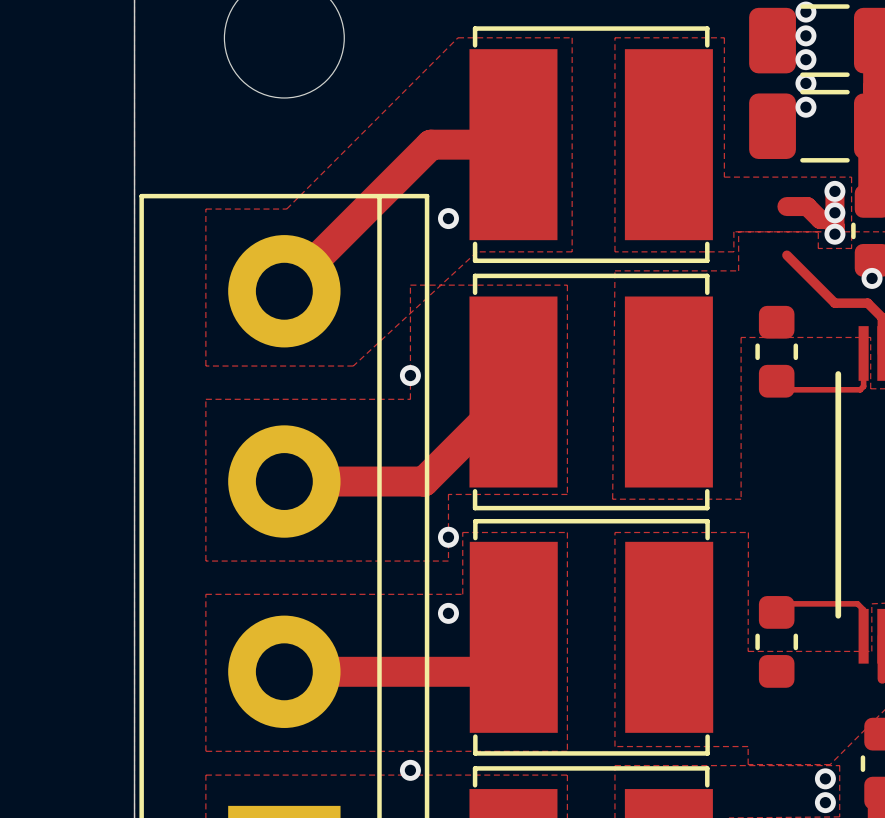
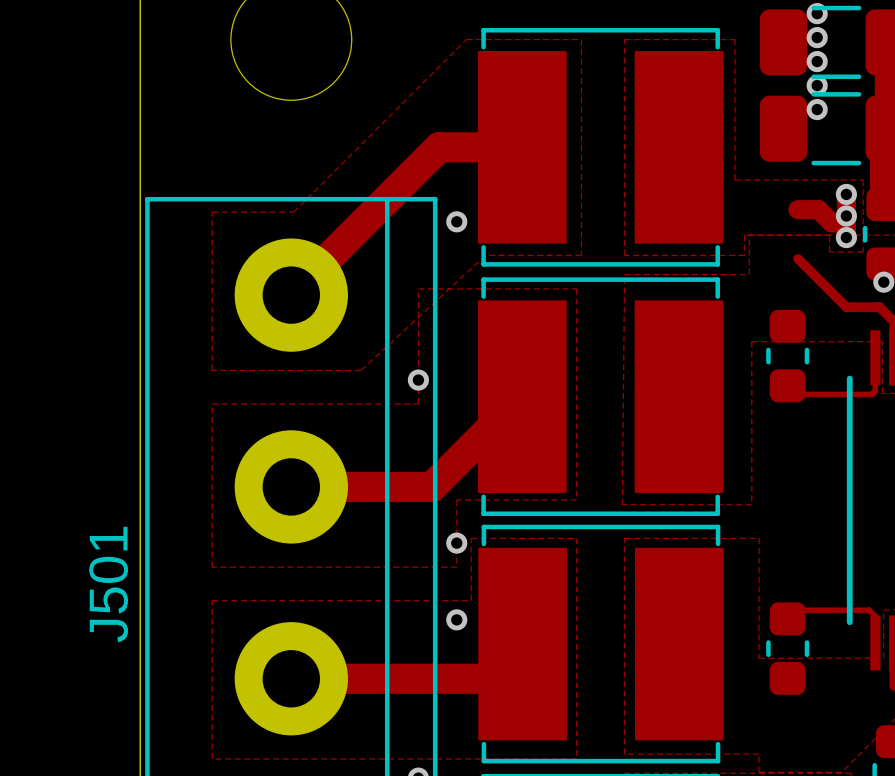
J501 name: none -> J501 (108, 584)

